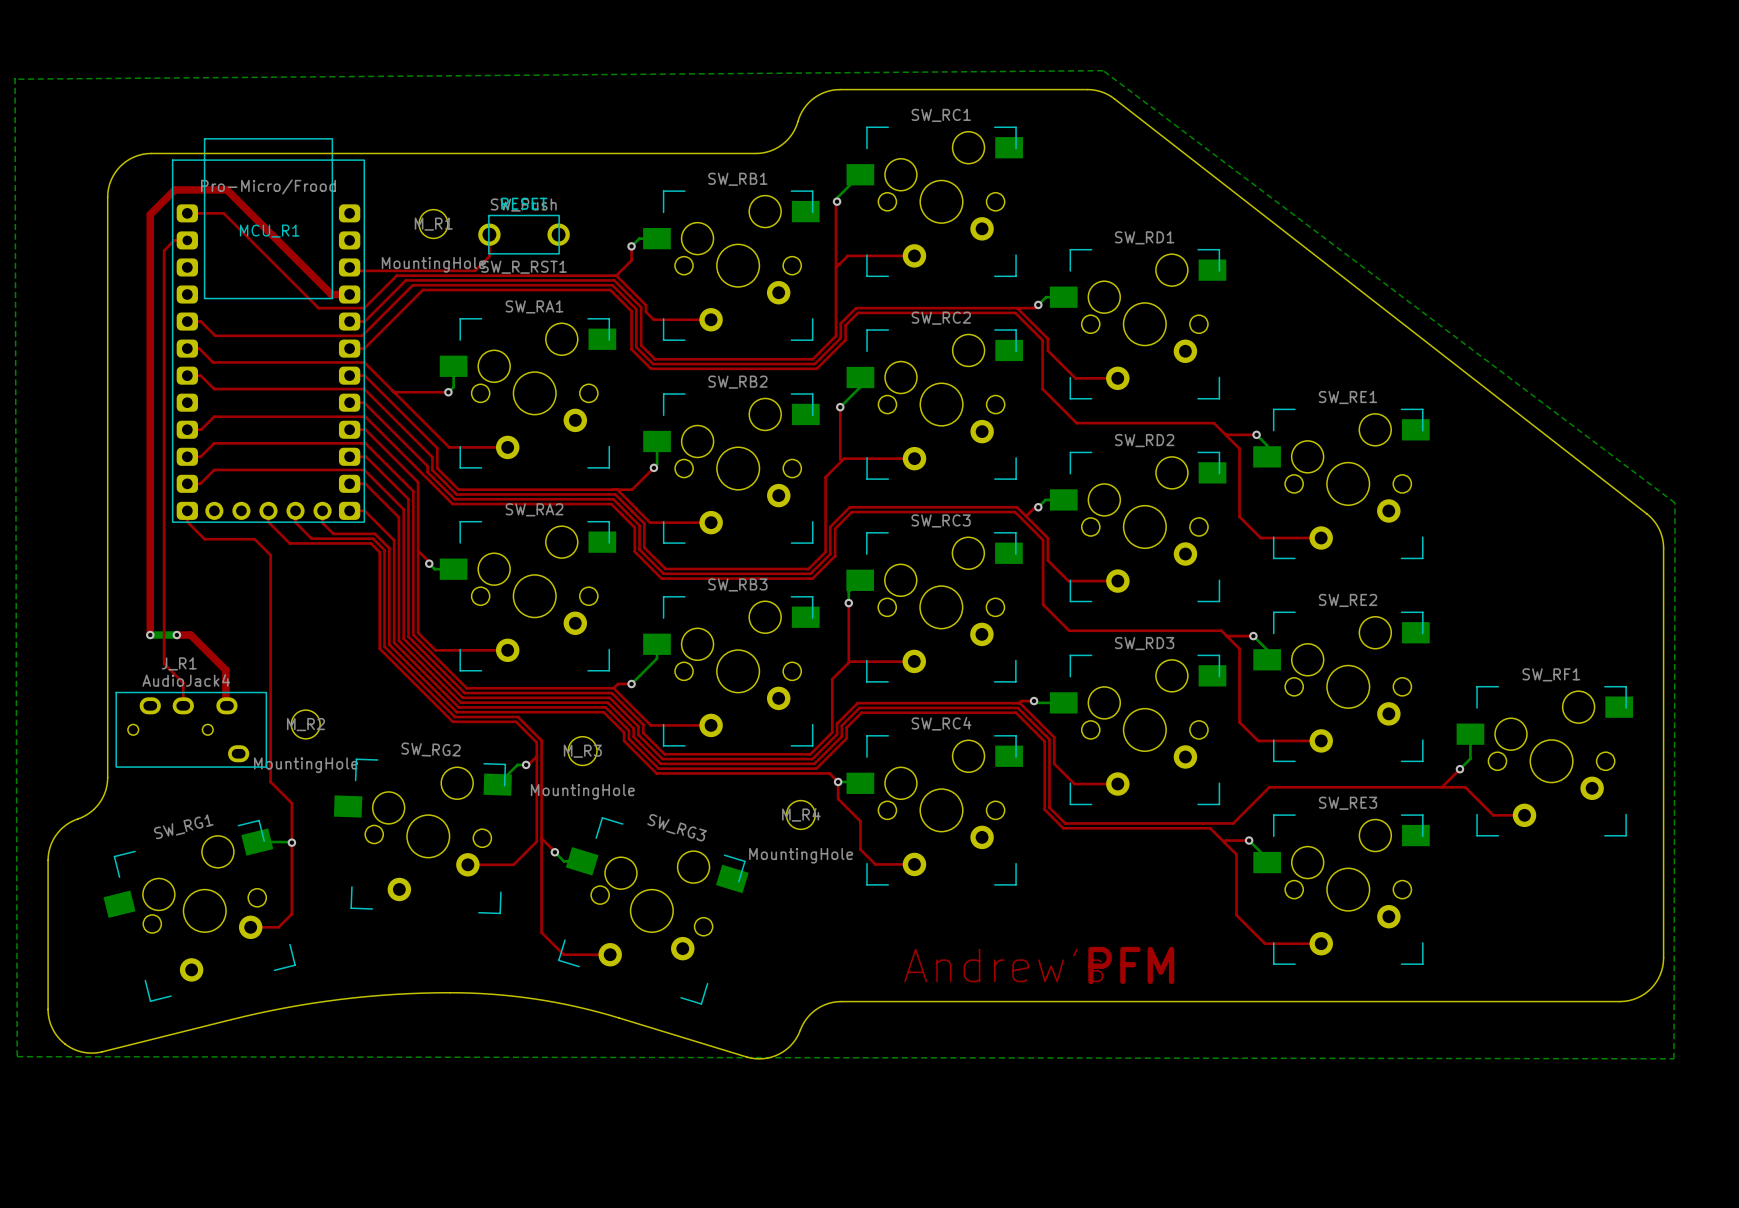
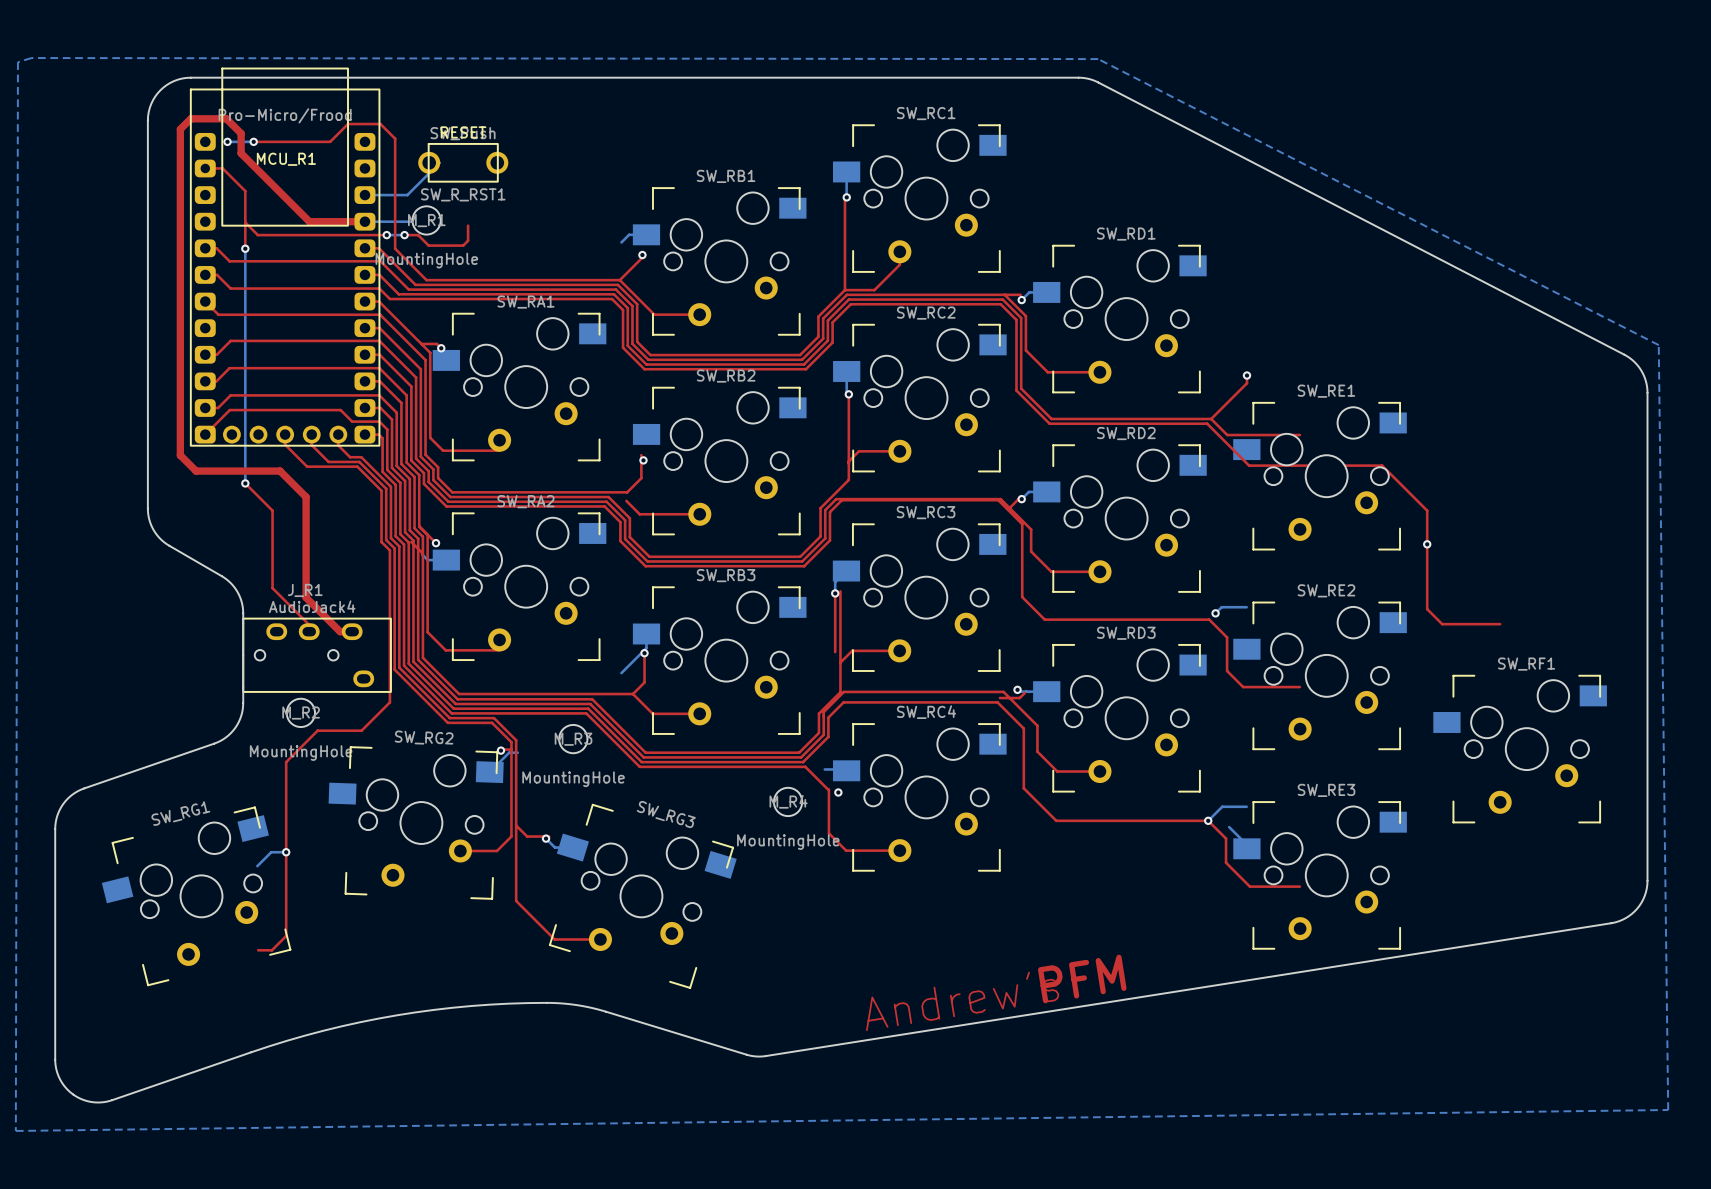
bottom zone outline: (1103, 70) (1675, 502) (1673, 1058) (17, 1056) (15, 78) (1103, 70) -> (31, 58) (17, 62) (15, 1130) (1668, 1110) (1658, 345) (1098, 59) (31, 58)
board edge: (839, 89) (1087, 89) (1108, 94) (1652, 518) (1661, 533) (1663, 548) (1663, 957) (1661, 970) (1653, 985) (1636, 998) (1619, 1001) (837, 1001) (824, 1004) (811, 1013) (794, 1041) (785, 1050) (771, 1057) (759, 1058) (746, 1056) (577, 1006) (514, 996) (460, 992) (381, 995) (299, 1005) (245, 1016) (97, 1052) (80, 1051) (64, 1043) (53, 1030) (48, 1014) (48, 856) (51, 843) (60, 829) (71, 821) (87, 814) (97, 805) (104, 794) (107, 781) (107, 197) (109, 184) (117, 169) (134, 156) (151, 153) (759, 153) (773, 149) (787, 139) (793, 131) (803, 108) (813, 98) (825, 91) (839, 89) -> (190, 77) (178, 79) (163, 87) (153, 100) (148, 116) (147, 511) (152, 527) (162, 540) (224, 577) (238, 594) (243, 610) (243, 706) (237, 725) (228, 735) (220, 740) (81, 789) (67, 799) (58, 812) (55, 829) (55, 1062) (57, 1072) (62, 1083) (77, 1097) (94, 1102) (109, 1100) (269, 1046) (341, 1026) (415, 1012) (490, 1004) (550, 1002) (584, 1006) (747, 1055) (764, 1056) (1611, 923) (1628, 916) (1641, 902) (1645, 892) (1647, 880) (1647, 392) (1642, 372) (1635, 363) (1626, 356) (1098, 82) (1086, 78) (190, 77)
bottom track: none -> (227, 141) (253, 141)
via: none -> (227, 141)
top track: none -> (253, 141) (330, 141) (348, 124) (380, 124) (395, 138) (395, 248) (426, 280) (619, 280)
via: none -> (253, 141)
bottom track: none -> (439, 162) (407, 195) (364, 195)
top track: none -> (205, 168) (222, 168) (245, 191) (245, 248)
bottom track: (860, 174) (837, 198) (837, 201) -> (846, 171) (846, 197)
top track: none -> (846, 197) (844, 199) (844, 290)
top track: (837, 201) (836, 336) (812, 359) (654, 359) (641, 345) (641, 307) (614, 280) (405, 280) (364, 321) (349, 321) -> none
via position: (837, 201) -> (846, 197)
top track: (187, 213) (223, 213) (318, 308) (364, 308) (396, 275) (616, 275) -> none
top track: none -> (364, 221) (309, 221) (241, 153) (241, 133) (226, 118) (190, 118) (180, 129) (180, 455) (196, 471) (280, 471) (306, 497) (306, 597) (340, 631) (352, 631)
bottom track: none -> (411, 221) (364, 221)
top track: none -> (245, 222) (257, 235) (386, 235)
top track: none -> (468, 225) (468, 240) (463, 245) (428, 245) (418, 235) (404, 235)
top track: (489, 234) (489, 256) (475, 270) (353, 270) (349, 267) -> none
SW_R_RST1 position: (524, 234) -> (463, 162)
bottom track: none -> (386, 235) (404, 235)
via: none -> (386, 235)
via: none -> (404, 235)
top track: (187, 240) (174, 240) (164, 250) (164, 663) (183, 682) (183, 705) -> none
top track: (631, 246) (631, 260) (616, 275) -> none
via position: (631, 246) -> (642, 255)
top track: none -> (205, 248) (216, 248) (229, 261) (380, 261) (408, 289) (615, 289) (632, 306) (632, 343) (648, 359) (802, 359) (823, 338) (823, 318) (846, 294) (1020, 294)
bottom track: none -> (245, 248) (245, 483)
via: none -> (245, 248)
top track: none -> (364, 248) (379, 248) (415, 284) (617, 284) (637, 304) (637, 341) (650, 355) (800, 355) (818, 336) (818, 316) (844, 290)
top track: (914, 255) (847, 255) (836, 267) -> (899, 251) (899, 264) (874, 290) (844, 290)
top track: none -> (642, 255) (642, 257) (619, 280)
top track: (616, 275) (645, 305) (645, 311) (653, 319) (664, 319) -> (619, 280) (654, 314)
top track: none -> (205, 274) (217, 274) (230, 288) (379, 288) (389, 299) (612, 299) (623, 310) (623, 347) (644, 369) (805, 369) (832, 342) (832, 322) (850, 304) (1000, 304) (1016, 319) (1016, 390) (1049, 423) (1207, 423) (1249, 465) (1382, 465) (1427, 510) (1427, 609) (1442, 624) (1500, 624)
top track: none -> (364, 274) (379, 274) (398, 294) (613, 294) (627, 308) (627, 345) (646, 364) (804, 364) (827, 340) (827, 320) (848, 299) (1002, 299) (1021, 318) (1021, 388) (1051, 418) (1211, 418)
top track: (349, 294) (331, 294) (226, 189) (174, 189) (150, 214) (150, 635) -> none
top track: (1038, 304) (1035, 308) (856, 308) (840, 323) (840, 338) (814, 364) (653, 364) (636, 347) (636, 309) (612, 285) (412, 285) (362, 335) (215, 335) (200, 321) (187, 321) -> none
top track: none -> (364, 301) (379, 301) (430, 352) (430, 437) (443, 450) (499, 450)
top track: (1017, 308) (1047, 338) (1047, 350) (1075, 378) -> (1025, 350) (1047, 372) (1058, 372)
MCU_R1 position: (268, 330) -> (285, 257)
top track: none -> (364, 328) (379, 328) (420, 369) (420, 456) (433, 469) (433, 480) (450, 497) (608, 497) (629, 518) (629, 537) (649, 556) (800, 556) (820, 536) (820, 508) (848, 479) (848, 394)
top track: (1042, 340) (1015, 312) (858, 312) (845, 325) (845, 340) (816, 368) (651, 368) (631, 349) (631, 311) (610, 290) (422, 290) (364, 348) (349, 348) -> (1025, 334) (1025, 316) (1004, 294)
top track: (187, 348) (199, 348) (213, 362) (364, 362) (449, 447) (507, 447) -> none
top track: none -> (421, 343) (436, 343) (441, 348)
top track: (1042, 356) (1042, 389) (1076, 423) (1213, 423) (1239, 448) (1239, 516) (1260, 538) (1321, 538) -> none
bottom track: (453, 366) (453, 387) (448, 392) -> none
top track: (187, 375) (200, 375) (214, 389) (364, 389) (432, 457) -> (205, 301) (218, 314) (380, 314) (425, 360) (425, 449)
top track: (349, 375) (364, 375) (437, 448) (437, 468) (458, 489) (632, 489) (653, 467) -> none
top track: none -> (1246, 375) (1246, 383) (1211, 418)
bottom track: (860, 386) (840, 407) -> (846, 380) (846, 392) (848, 394)
top track: none -> (205, 381) (216, 381) (229, 368) (379, 368) (406, 395) (406, 462) (419, 475) (419, 526) (436, 543)
top track: none -> (364, 381) (379, 381) (401, 402) (401, 464) (414, 477) (414, 528) (422, 536) (422, 657) (459, 694) (632, 694)
top track: (394, 392) (448, 392) -> none
via position: (448, 392) -> (441, 348)
top track: (349, 402) (364, 402) (427, 466) (427, 472) (454, 499) (613, 499) (626, 512) -> none
top track: (840, 407) (840, 459) (841, 460) -> none
via position: (840, 407) -> (848, 394)
top track: (233, 416) (214, 416) (201, 429) (187, 429) -> (229, 410) (205, 434)
top track: (346, 416) (365, 416) (452, 504) (611, 504) (622, 514) -> none
top track: none -> (1211, 418) (1227, 435) (1299, 435)
top track: (349, 429) (365, 429) (418, 482) (418, 632) (435, 650) (507, 650) -> none
top track: (1256, 434) (1226, 435) -> none
bottom track: (1256, 434) (1267, 445) (1267, 456) -> none
via position: (1256, 434) -> (1246, 375)
top track: none -> (285, 434) (285, 444) (307, 466) (357, 466) (381, 490) (381, 542) (389, 550) (389, 702) (361, 730) (317, 730) (286, 762) (286, 936) (271, 950) (258, 950)
bottom track: (657, 441) (657, 464) (653, 467) -> none
top track: (187, 456) (200, 456) (214, 443) (365, 443) (413, 491) (413, 634) (466, 688) (613, 688) -> none
top track: (349, 456) (366, 456) (408, 499) (408, 636) (464, 693) (611, 693) (643, 724) (643, 732) (664, 754) (810, 754) (832, 732) -> (205, 407) (218, 407) (230, 395) (379, 395) (396, 412) (396, 465) (409, 479) (409, 530) (418, 538) (418, 659) (457, 699) (592, 699) (645, 752) (799, 752) (818, 732) (818, 720)
top track: (872, 458) (844, 458) (825, 477) (825, 552) (808, 569) (665, 569) (644, 547) (644, 523) (631, 511) -> (858, 451) (848, 461)
top track: (432, 462) (432, 470) (456, 494) (615, 494) (631, 510) -> (425, 454) (438, 467) (438, 478) (452, 492) (627, 492) (641, 478) (641, 455)
top track: (187, 483) (200, 483) (214, 469) (364, 469) (403, 509) (403, 638) (462, 697) (609, 697) (638, 726) (638, 734) (662, 759) (812, 759) (837, 734) -> (364, 407) (380, 407) (392, 419) (392, 467) (405, 481) (405, 532) (413, 540) (413, 661) (455, 703) (590, 703) (643, 757) (801, 757) (823, 734) (823, 722)
top track: (349, 483) (365, 483) (398, 517) (398, 640) (460, 702) (607, 702) (633, 728) (633, 736) (660, 763) (814, 763) (841, 736) -> (340, 410) (352, 421) (379, 421) (387, 429) (387, 469) (400, 482) (400, 534) (408, 542) (408, 663) (453, 708) (588, 708) (641, 762) (803, 762) (828, 736) (828, 724)
top track: (617, 489) (636, 508) -> none
top track: none -> (245, 483) (272, 510) (272, 588) (309, 624) (309, 631)
via: none -> (245, 483)
top track: (187, 510) (187, 521) (204, 539) (254, 539) (270, 555) (270, 781) (291, 803) (291, 914) (278, 927) (250, 927) -> none
top track: (268, 510) (268, 522) (289, 543) (370, 543) (379, 552) (379, 648) (452, 721) (516, 721) (536, 742) (536, 841) (513, 864) (505, 864) -> (311, 434) (311, 445) (328, 461) (359, 461) (386, 488) (386, 540) (394, 548) (394, 669) (447, 722) (492, 722) (511, 742) (511, 836) (496, 850)
top track: (295, 510) (295, 522) (311, 538) (372, 538) (384, 550) (384, 646) (454, 717) (518, 717) (541, 740) (541, 932) -> (338, 434) (338, 445) (350, 457) (361, 457) (390, 486) (390, 538) (399, 546) (399, 667) (449, 718) (494, 718) (516, 740) (516, 900) (532, 917)
top track: (322, 510) (322, 523) (333, 533) (374, 533) (389, 548) (389, 644) (456, 712) (603, 712) (624, 732) (624, 740) (656, 773) (829, 773) (838, 781) (838, 799) -> (364, 434) (378, 434) (382, 438) (382, 471) (395, 484) (395, 536) (404, 544) (404, 665) (451, 713) (586, 713) (639, 766) (805, 766) (824, 786)
top track: (349, 510) (364, 510) (394, 540) (394, 642) (458, 707) (605, 707) (628, 730) (628, 738) (658, 768) (816, 768) (846, 738) (846, 727) (861, 712) (1015, 712) (1044, 741) (1044, 809) (1063, 828) (1210, 828) (1236, 854) (1236, 915) (1265, 943) (1321, 943) -> none
top track: (851, 512) (1015, 512) (1043, 540) (1043, 604) (1069, 630) (1221, 630) (1239, 648) (1239, 722) (1258, 740) (1321, 740) -> (838, 503) (841, 500) (998, 500) (1022, 524) (1022, 597) (1044, 619) (1209, 619) (1227, 637) (1227, 670) (1243, 687) (1299, 687)
top track: (626, 513) (639, 525) (639, 549) (663, 573) (810, 573) (830, 554) (830, 526) (838, 518) -> (205, 354) (216, 354) (230, 340) (379, 340) (416, 377) (416, 458) (428, 471) (428, 482) (448, 501) (606, 501) (625, 520) (625, 539) (647, 561) (802, 561) (825, 538) (825, 510)
top track: (622, 515) (634, 527) (634, 551) (661, 578) (812, 578) (835, 556) (835, 528) (843, 520) -> (364, 354) (379, 354) (411, 386) (411, 460) (423, 473) (423, 483) (446, 506) (604, 506) (620, 522) (620, 541) (645, 566) (804, 566) (829, 540) (829, 512)
top track: none -> (427, 534) (427, 632) (445, 650) (499, 650)
via: none -> (1427, 544)
via position: (429, 563) -> (436, 543)
top track: none -> (840, 591) (840, 692) (818, 713)
bottom track: none -> (1246, 607) (1221, 607) (1215, 613)
bottom track: (150, 635) (176, 635) -> none
via: (150, 635) -> none
top track: (176, 635) (190, 635) (225, 670) (226, 705) -> none
via: (176, 635) -> none
top track: (1226, 636) (1253, 636) -> none
bottom track: (1253, 636) (1267, 649) (1267, 659) -> none
via position: (1253, 636) -> (1215, 613)
top track: (914, 661) (849, 661) (832, 679) (832, 725) -> (899, 650) (852, 650) (840, 662)
top track: none -> (644, 653) (644, 682) (632, 694)
top track: (631, 684) (617, 684) (613, 688) -> none
via position: (631, 684) -> (644, 653)
top track: (613, 688) (650, 725) (663, 725) -> (632, 694) (652, 713)
top track: (1034, 701) (1021, 701) (1019, 703) -> none
top track: none -> (1024, 692) (1019, 698) (999, 698)
J_R1 position: (191, 729) -> (317, 655)
top track: (841, 729) (841, 725) (859, 707) (1017, 707) (1049, 739) (1049, 807) (1065, 823) (1233, 823) (1269, 787) (1465, 787) (1493, 815) (1524, 815) -> (828, 717) (843, 702) (997, 702) (1023, 728) (1023, 788) (1056, 820) (1208, 820) (1226, 838) (1226, 862) (1249, 886) (1299, 886)
bottom track: (1470, 734) (1470, 758) (1459, 769) -> none
top track: (536, 756) (526, 764) -> none
top track: none -> (511, 749) (500, 750)
via position: (526, 764) -> (500, 750)
top track: (1459, 769) (1441, 787) -> none
via: (1459, 769) -> none
via position: (838, 781) -> (838, 792)
top track: (841, 802) (860, 821) (860, 849) (875, 864) -> (828, 789) (828, 833) (846, 850) (861, 850)
bottom track: none -> (1246, 806) (1222, 806) (1208, 820)
top track: none -> (516, 825) (527, 836) (549, 836)
top track: (541, 838) (554, 852) -> none
top track: (1249, 840) (1224, 842) -> none
via position: (1249, 840) -> (1208, 820)
bottom track: (257, 842) (291, 842) -> none
via position: (291, 842) -> (286, 852)
bottom track: none -> (286, 852) (271, 852) (257, 866)
text rotation: 0° (1003, 965) -> 9° counterclockwise (962, 1001)
text rotation: 0° (1131, 965) -> 9° counterclockwise (1082, 979)

